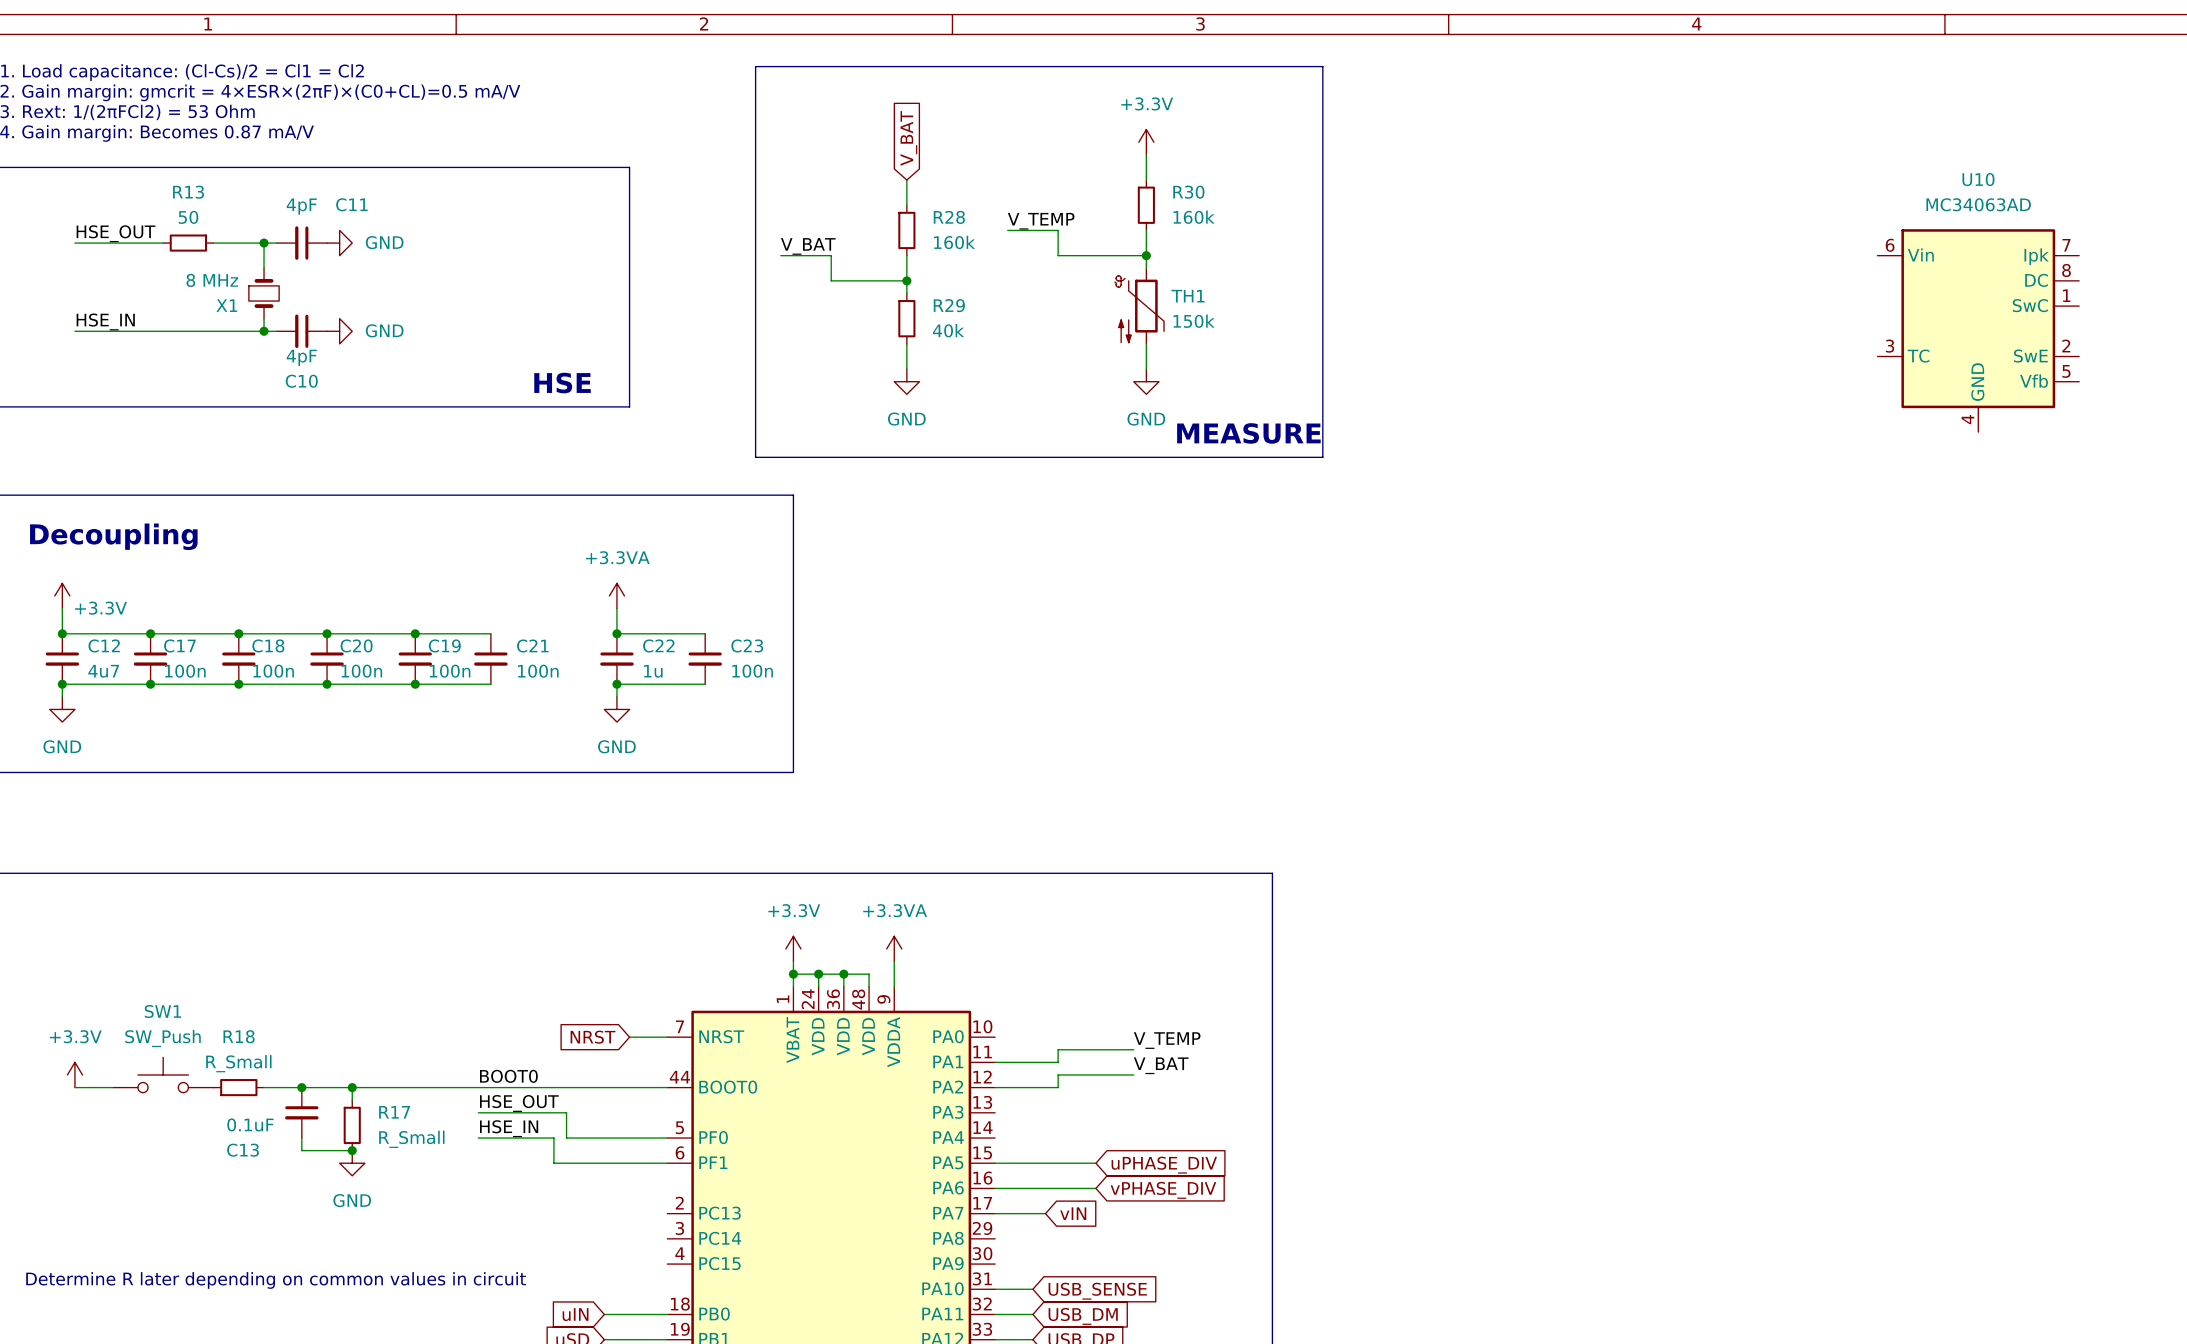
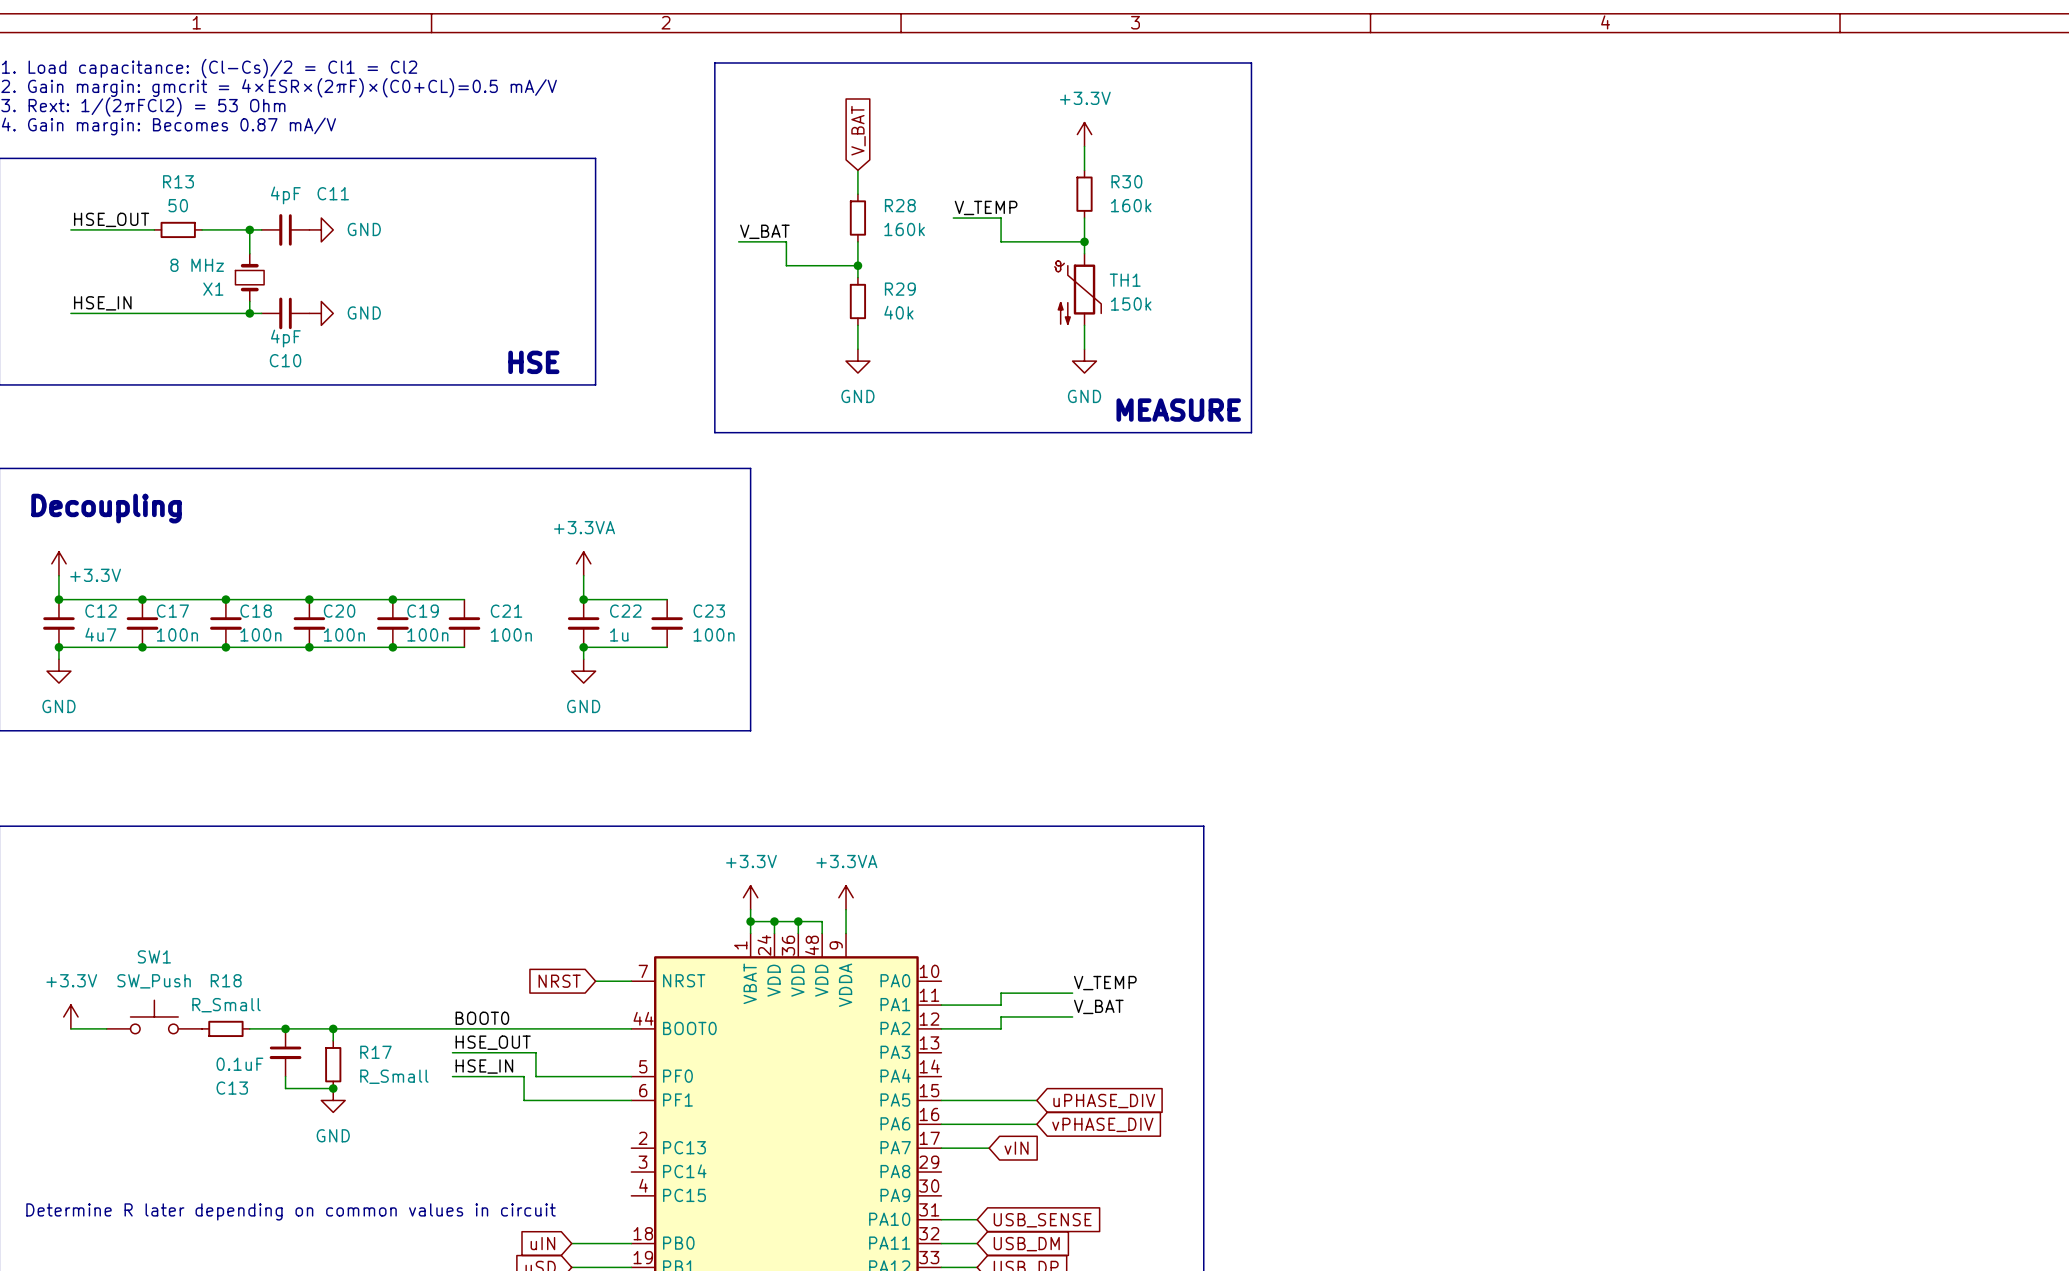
U10: MC34063AD (1978, 330) -> none

